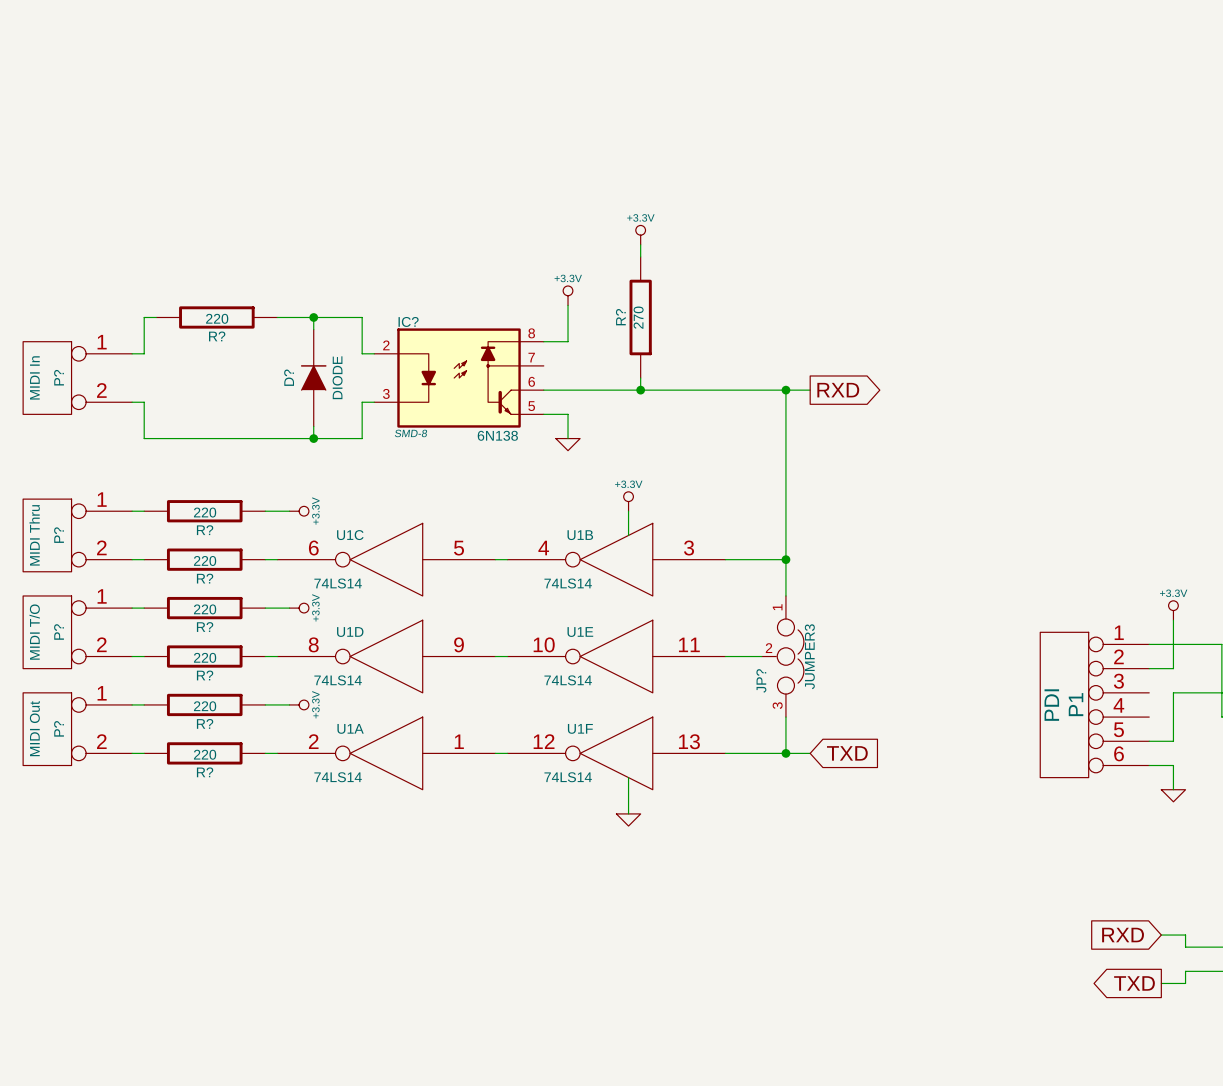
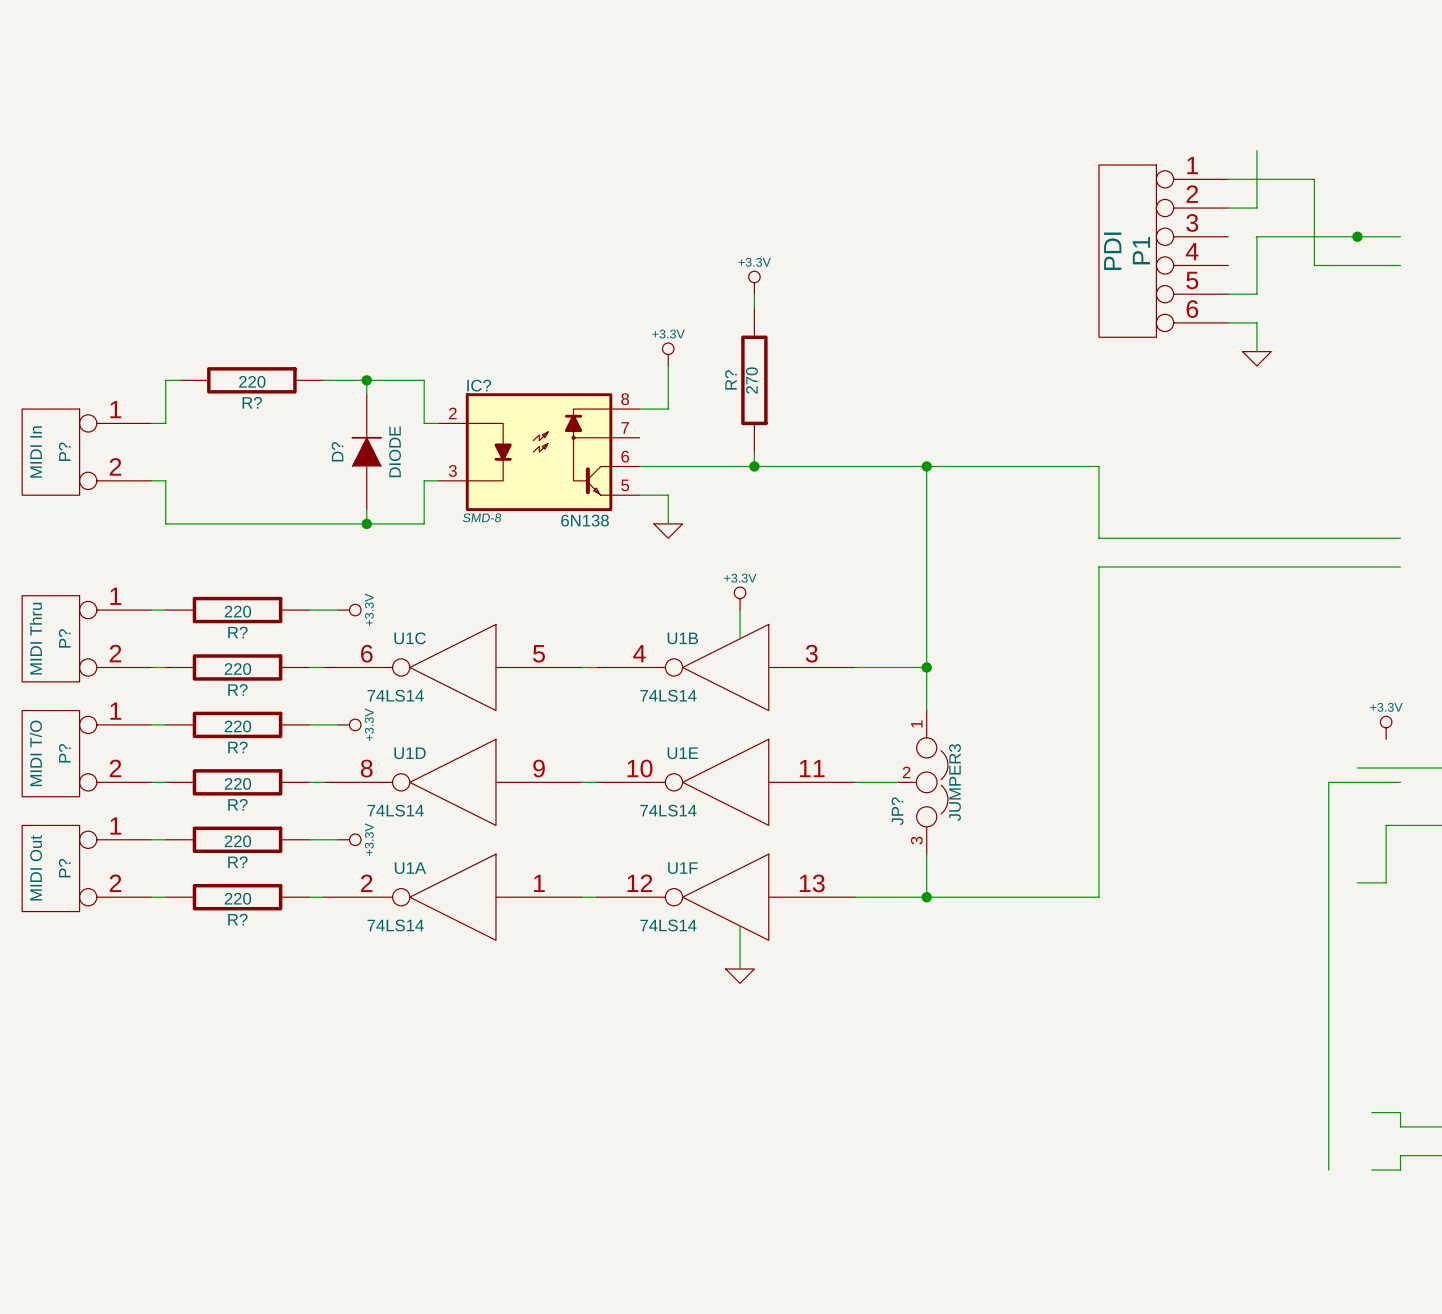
wire: none -> (1256, 150) (1256, 208) (1228, 208)
wire: none -> (1228, 179) (1314, 179) (1314, 265) (1400, 265)
junction: none -> (1357, 236)
wire: none -> (1400, 236) (1256, 236) (1256, 294) (1228, 294)
wire: none -> (1228, 322) (1256, 322) (1256, 351)
power symbol: none -> (1256, 358)
wire: none -> (955, 466) (1098, 466) (1098, 538) (1400, 538)
global label: RXD (838, 390) -> none
wire: none -> (1400, 566) (1098, 566) (1098, 897) (955, 897)
wire: (1173, 620) (1173, 668) (1149, 668) -> none
wire: none -> (1400, 782) (1328, 782) (1328, 1170)
P1 position: (1094, 704) -> (1163, 251)
global label: TXD (847, 753) -> none
wire: (1149, 765) (1173, 765) (1173, 789) -> none
power symbol: (1173, 795) -> none
global label: RXD (1123, 935) -> none
global label: TXD (1134, 983) -> none

